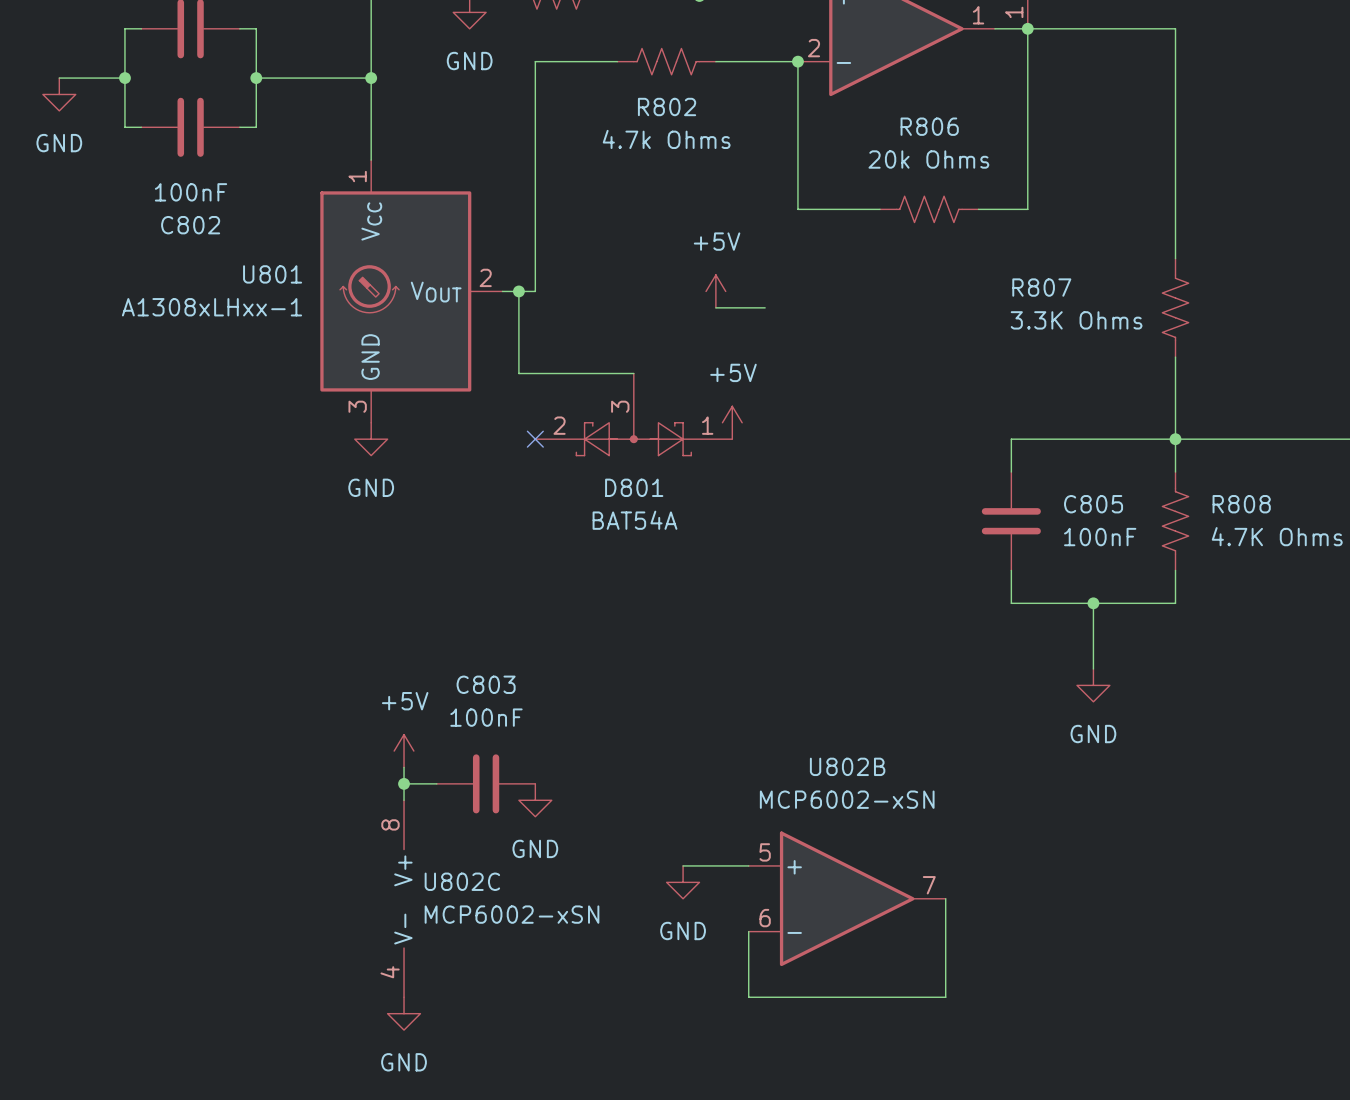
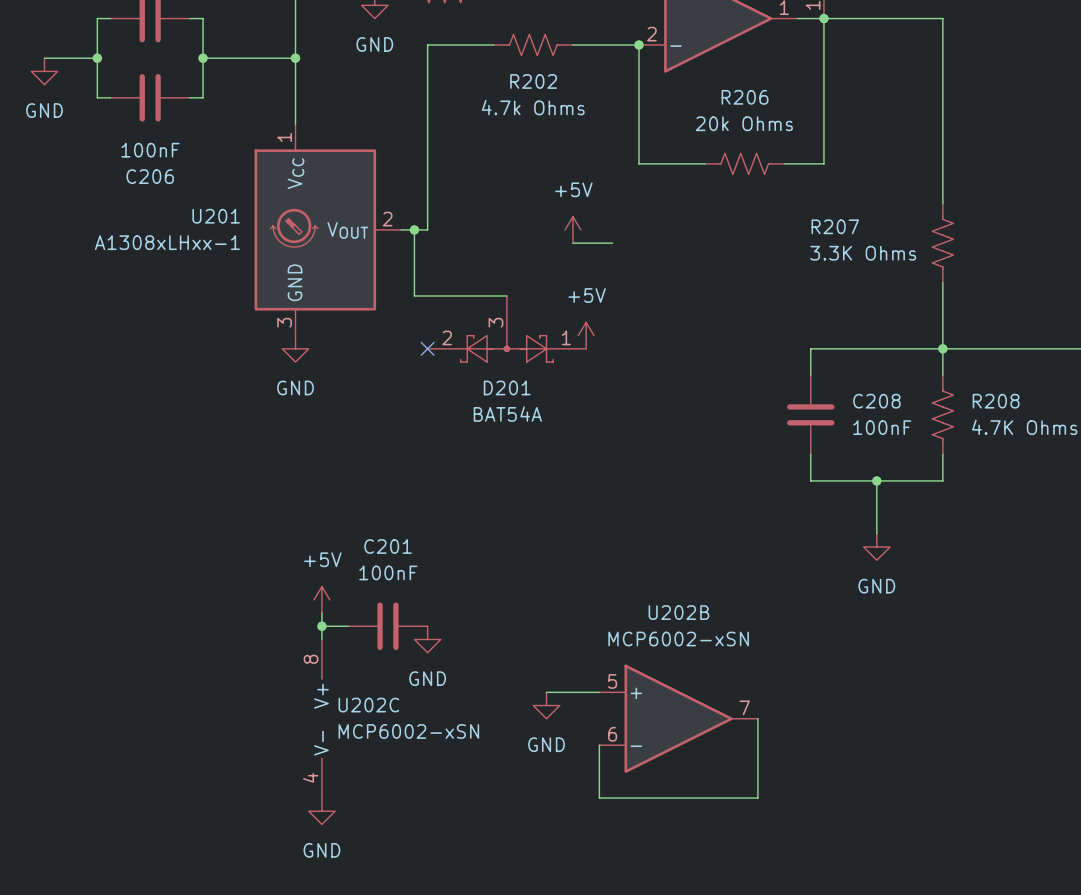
R802 name: R802 (667, 106) -> R202 (533, 81)
R806 name: R806 (929, 126) -> R206 (745, 97)
C802 name: C802 (190, 225) -> C206 (150, 176)
U801 name: U801 (272, 274) -> U201 (216, 216)
R807 name: R807 (1041, 287) -> R207 (835, 226)
D801 name: D801 (634, 487) -> D201 (507, 387)
C805 name: C805 (1093, 504) -> C208 (876, 401)
R808 name: R808 (1241, 504) -> R208 (996, 401)
C803 name: C803 (486, 684) -> C201 (387, 546)
U802B name: U802B (847, 766) -> U202B (678, 612)
U802C name: U802C (462, 881) -> U202C (368, 705)

